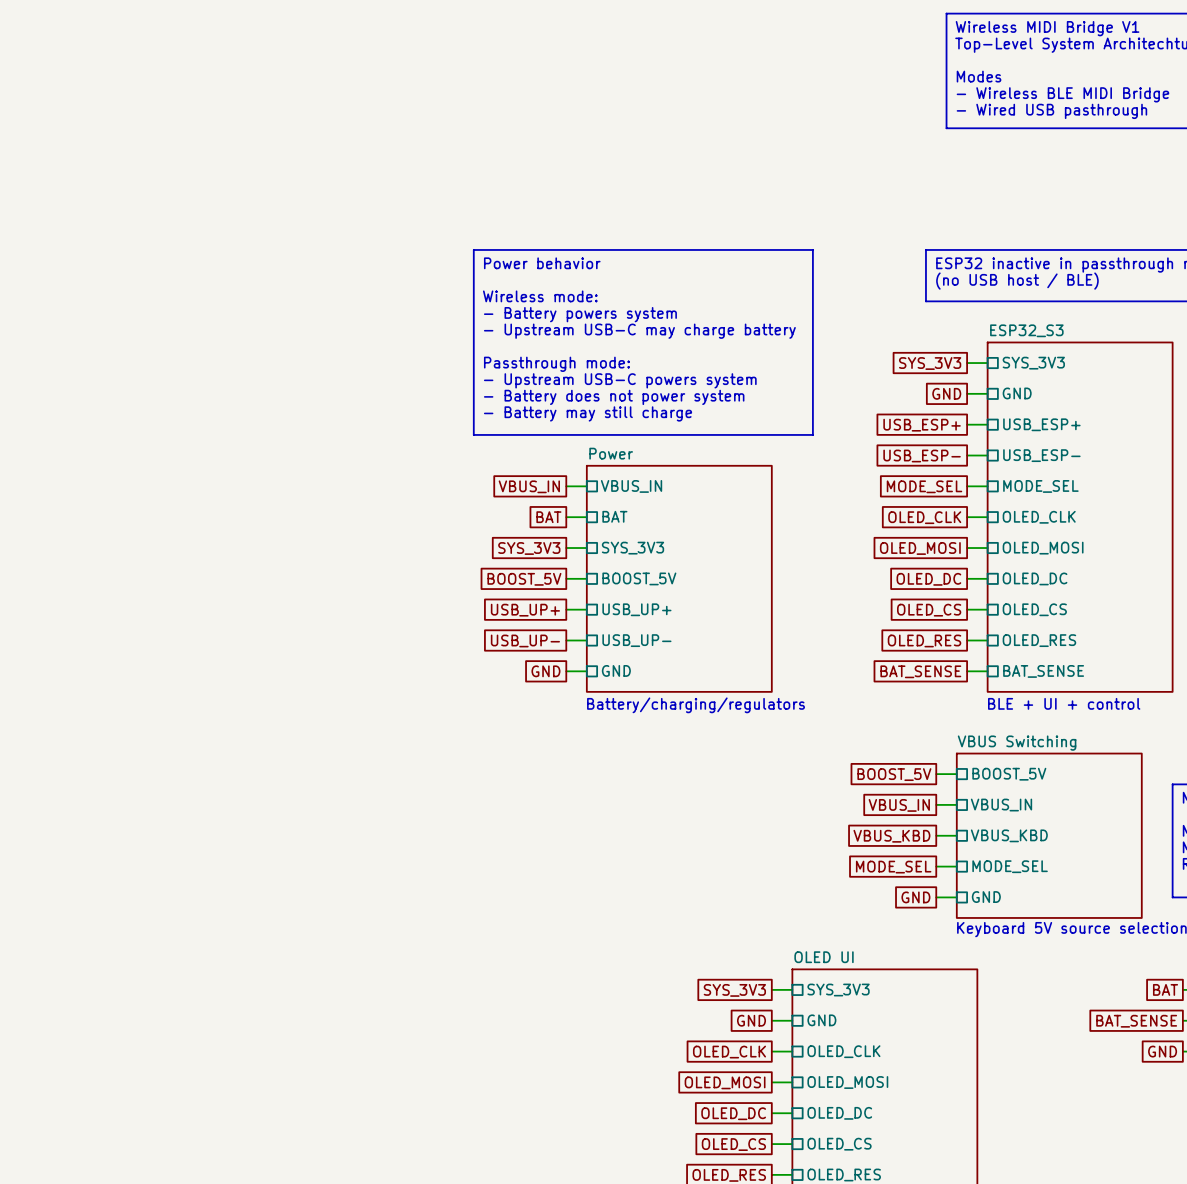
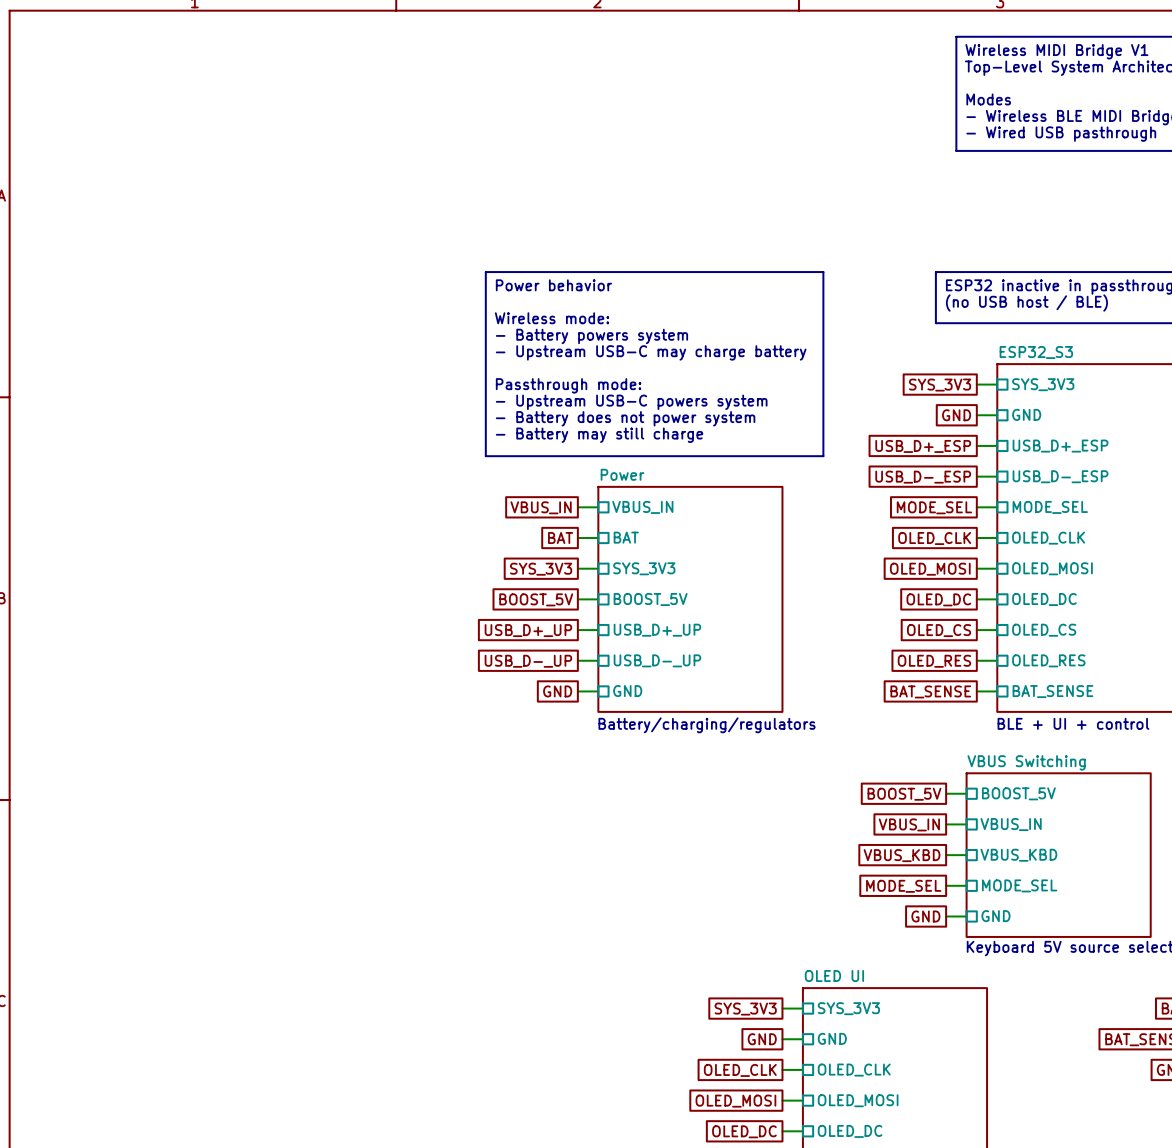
sheet pin: USB_ESP+ (1041, 424) -> USB_D+_ESP (1060, 446)
global label: USB_ESP+ (922, 425) -> USB_D+_ESP (923, 446)
sheet pin: USB_ESP- (1041, 455) -> USB_D-_ESP (1060, 476)
global label: USB_ESP- (922, 456) -> USB_D-_ESP (923, 477)
sheet pin: USB_UP+ (636, 609) -> USB_D+_UP (657, 630)
global label: USB_UP+ (525, 610) -> USB_D+_UP (528, 630)
global label: USB_UP- (525, 640) -> USB_D-_UP (528, 661)
sheet pin: USB_UP- (636, 640) -> USB_D-_UP (657, 660)

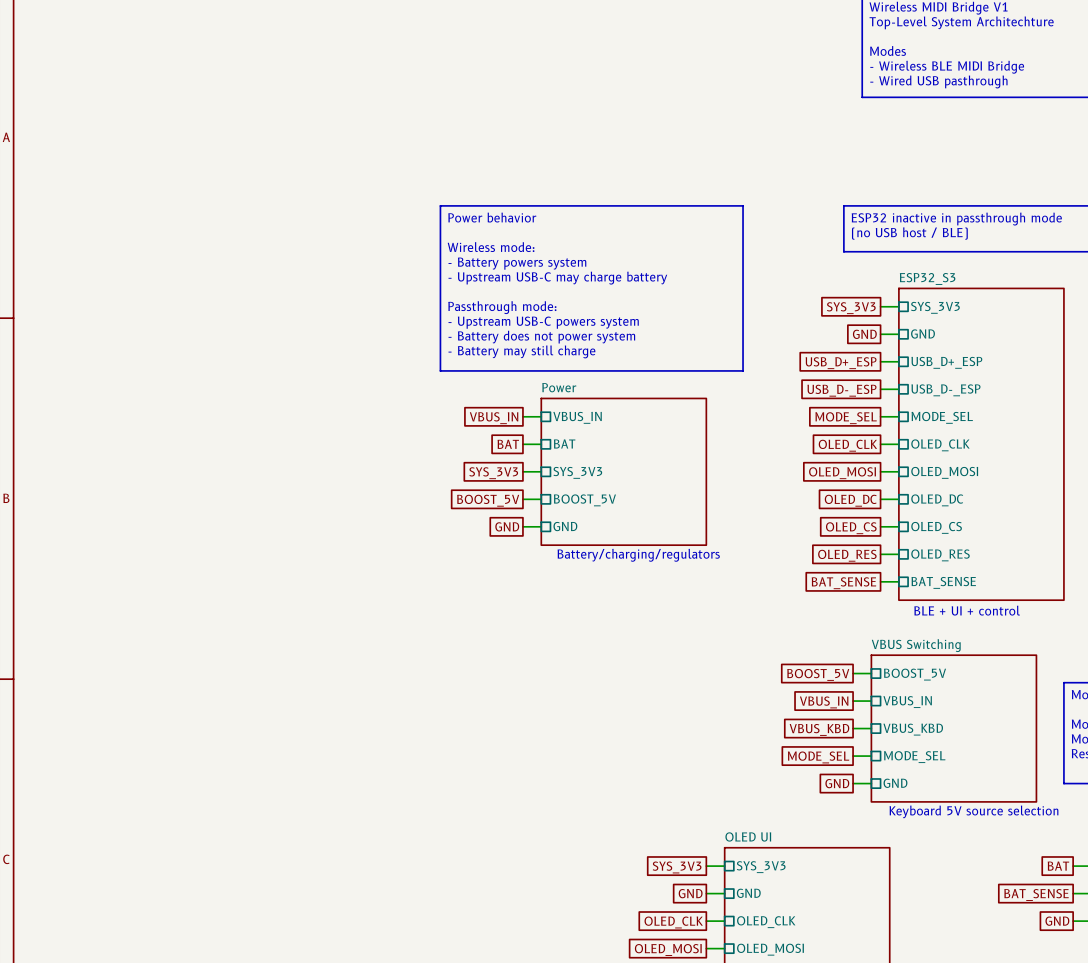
sheet Power: none -> (623, 471)
sheet Power: (690, 599) -> none
global label: USB_D+_UP (528, 630) -> GND (507, 526)
sheet pin: USB_D+_UP (657, 630) -> GND (565, 526)
wire: (577, 660) (598, 660) -> none
sheet pin: USB_D-_UP (657, 660) -> none
global label: USB_D-_UP (528, 661) -> none
global label: GND (557, 691) -> none
wire: (577, 691) (598, 691) -> none
sheet pin: GND (627, 691) -> none
text position: Battery/charging/regulators (707, 725) -> Battery/charging/regulators (638, 555)

